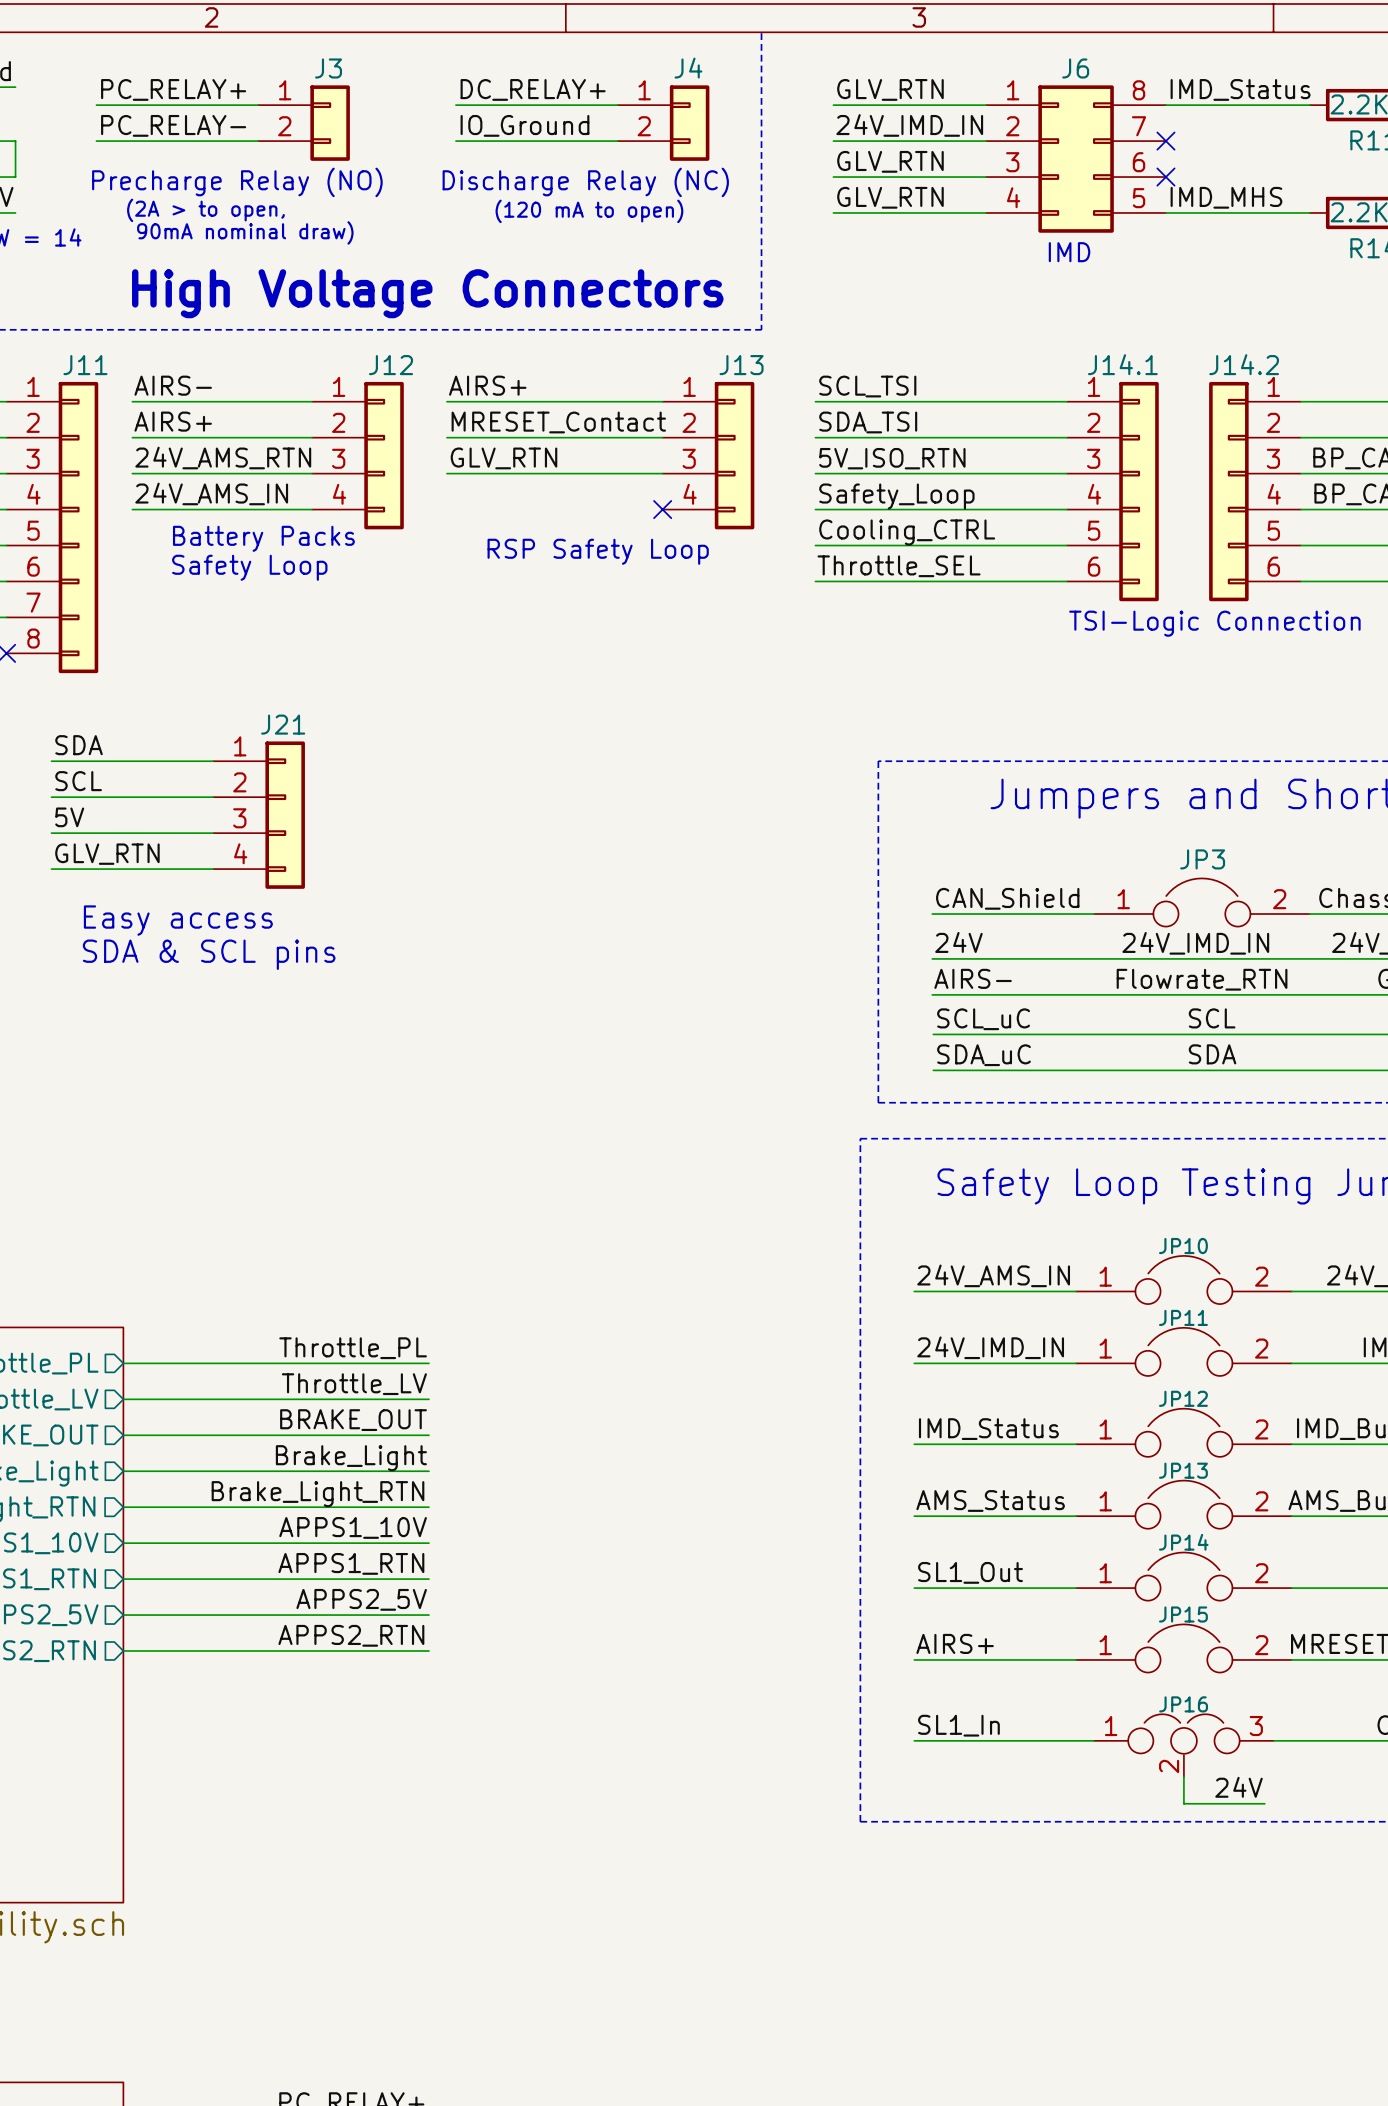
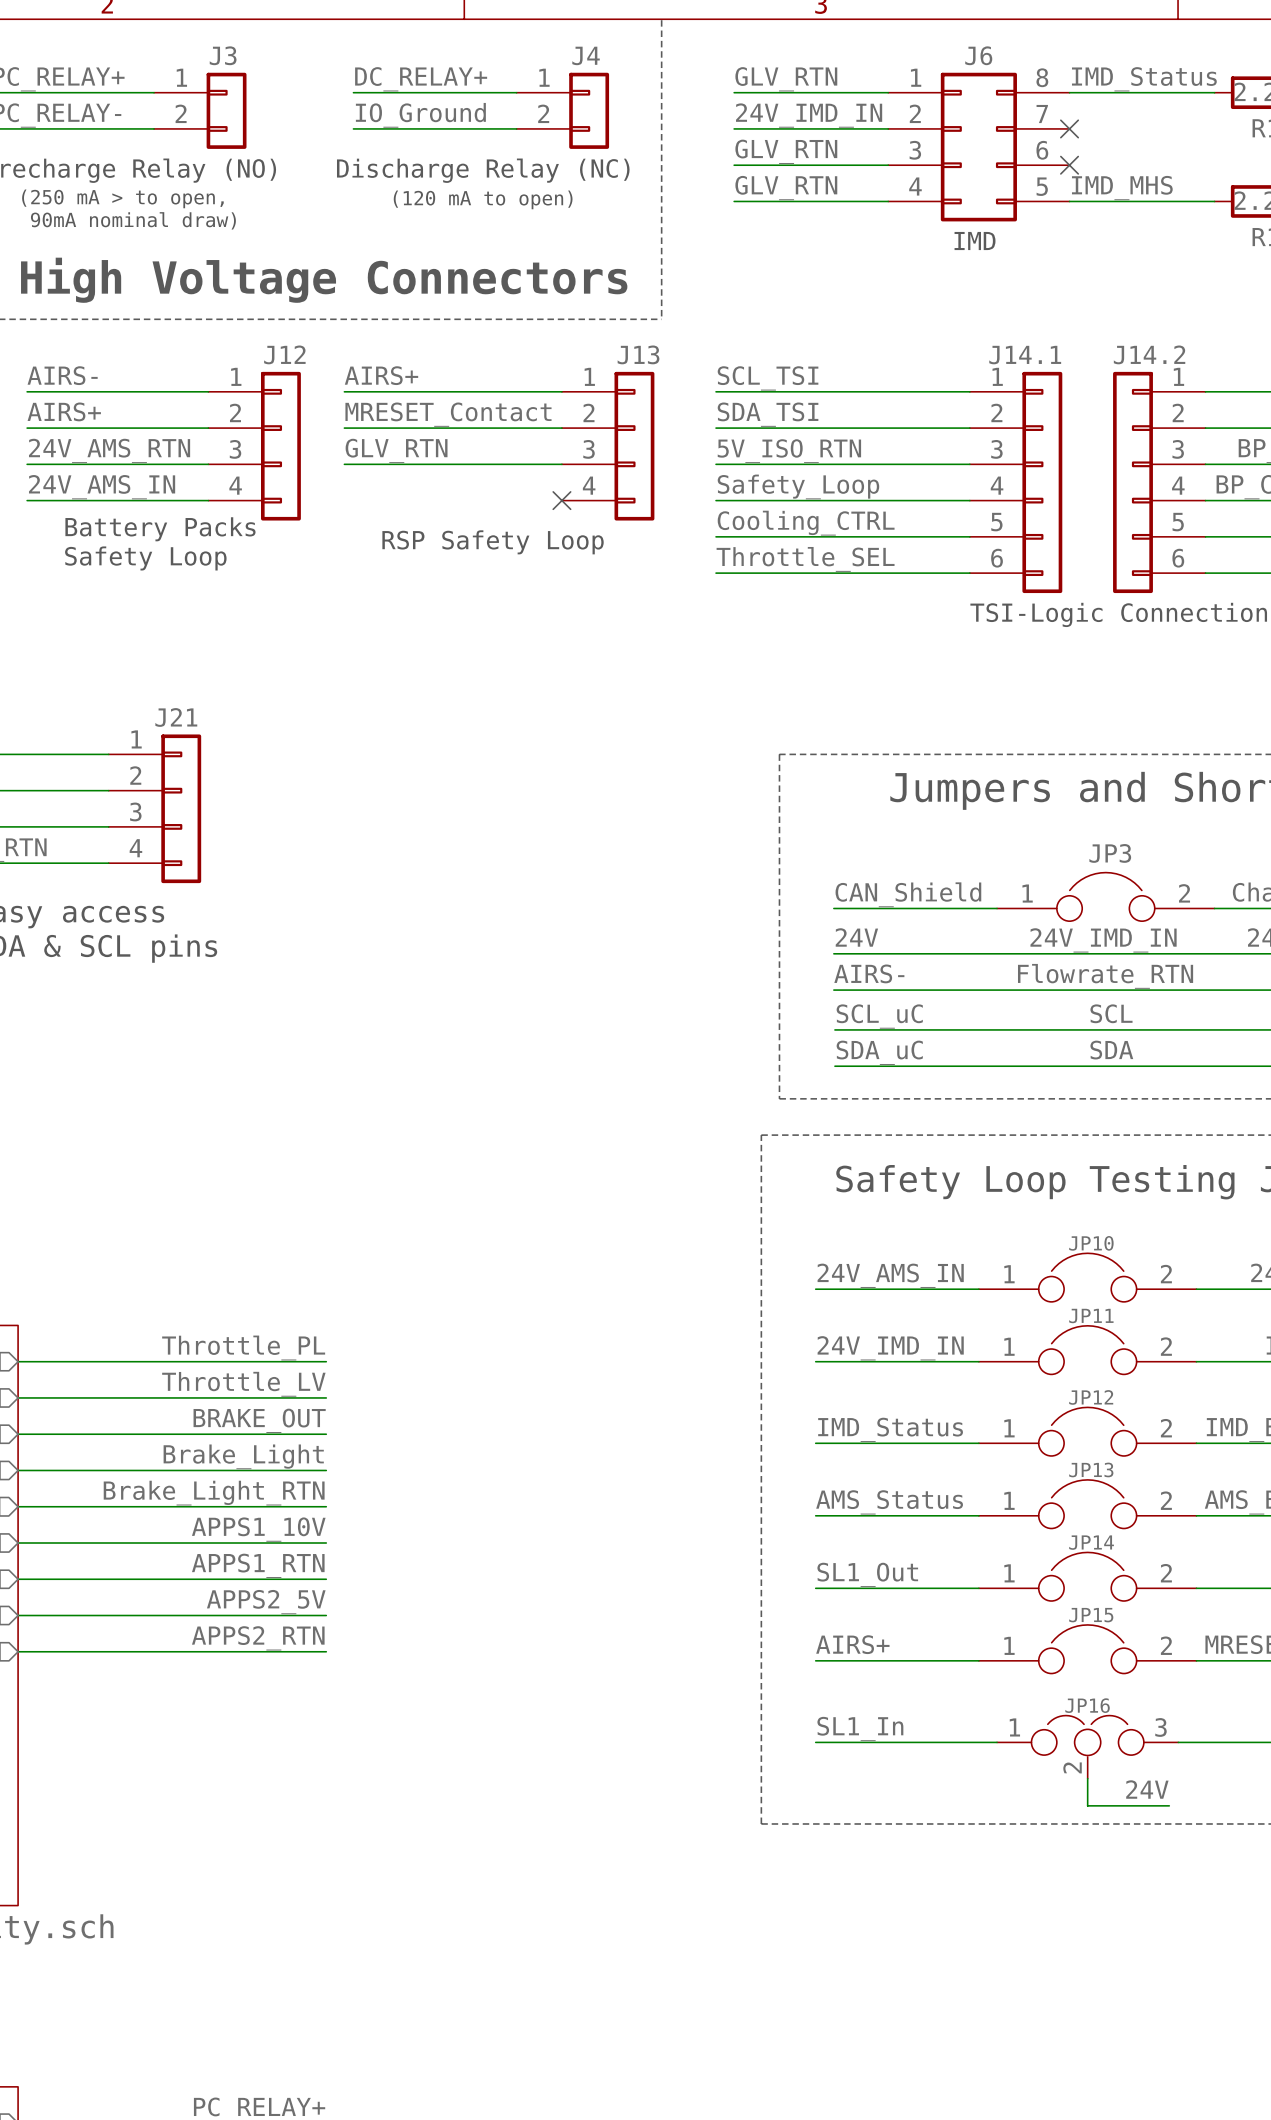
text: (2A > to open, (205, 210) -> (250 mA > to open, (122, 198)

